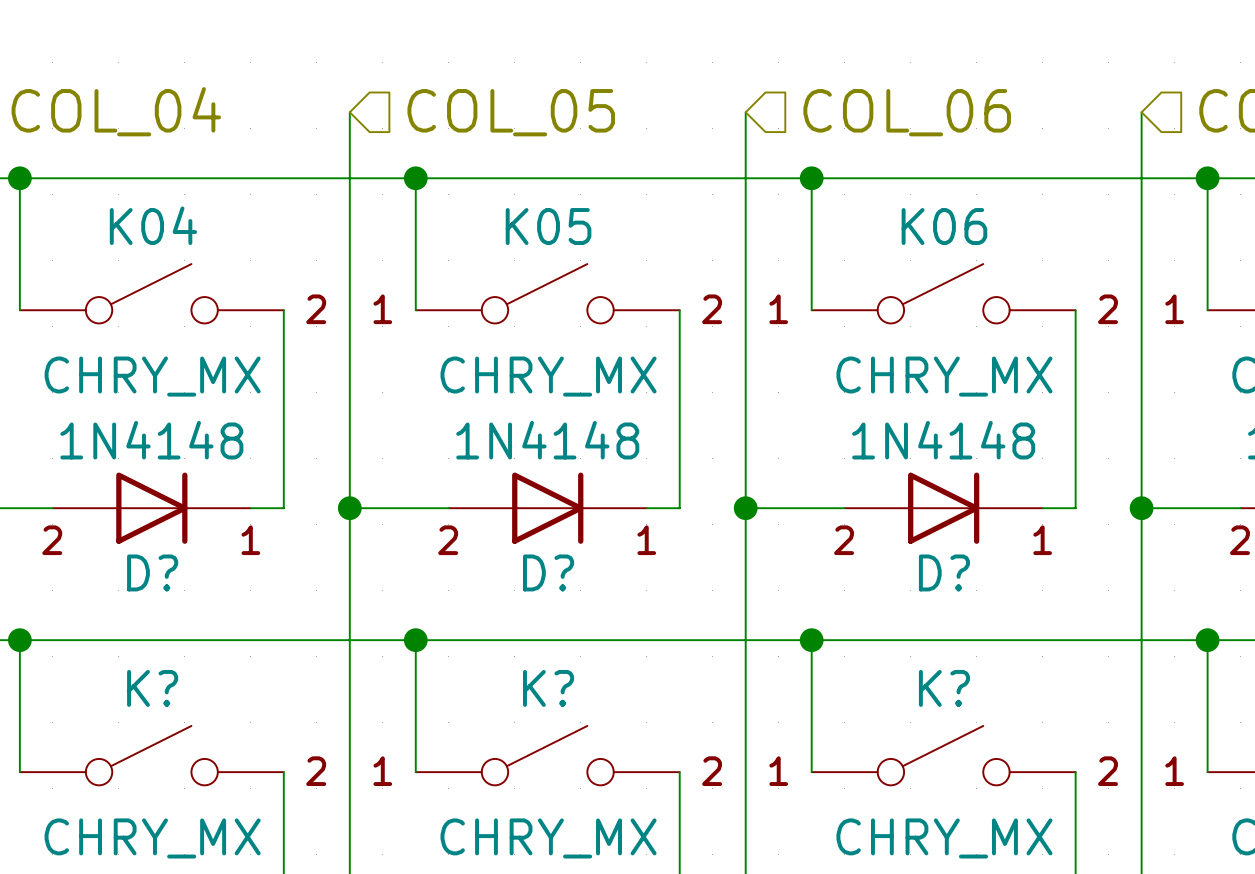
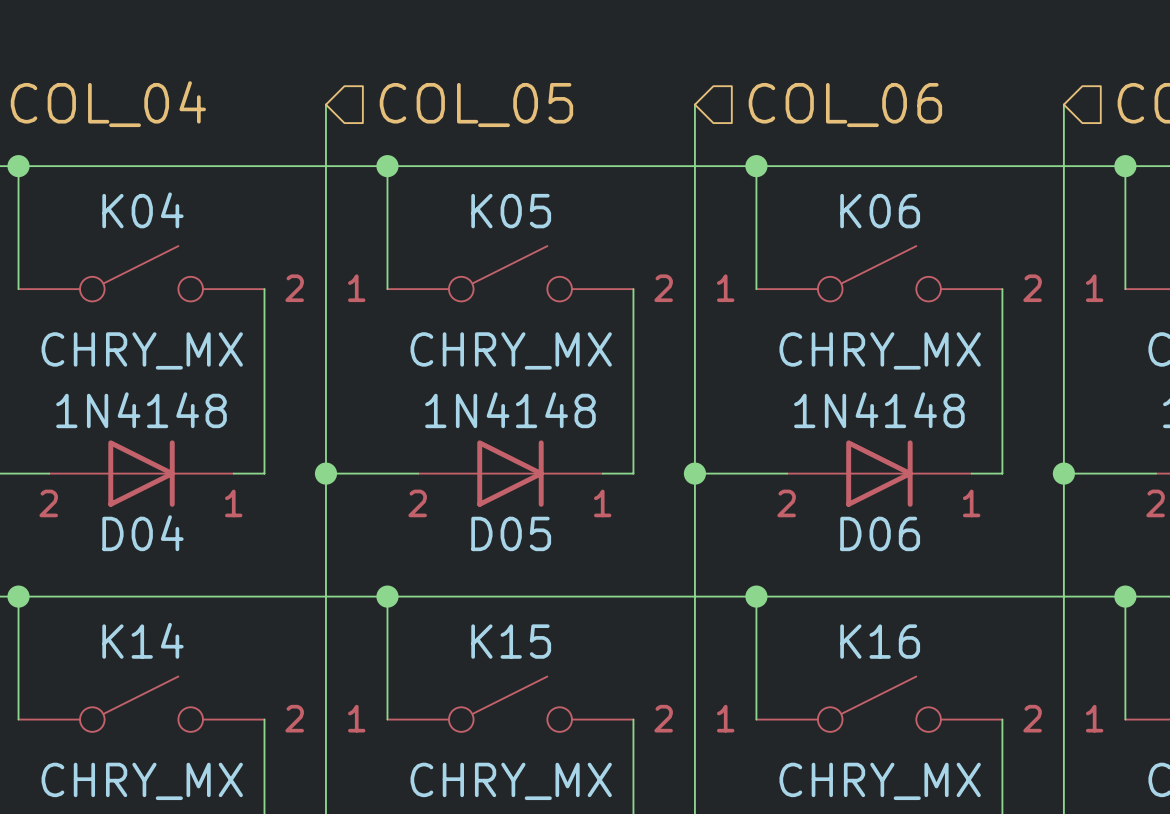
D? name: D? (152, 572) -> D04 (142, 533)
D? name: D? (548, 572) -> D05 (511, 533)
D? name: D? (944, 572) -> D06 (880, 533)
K? name: K? (152, 688) -> K14 (142, 640)
K? name: K? (548, 688) -> K15 (511, 641)
K? name: K? (944, 688) -> K16 (880, 641)

